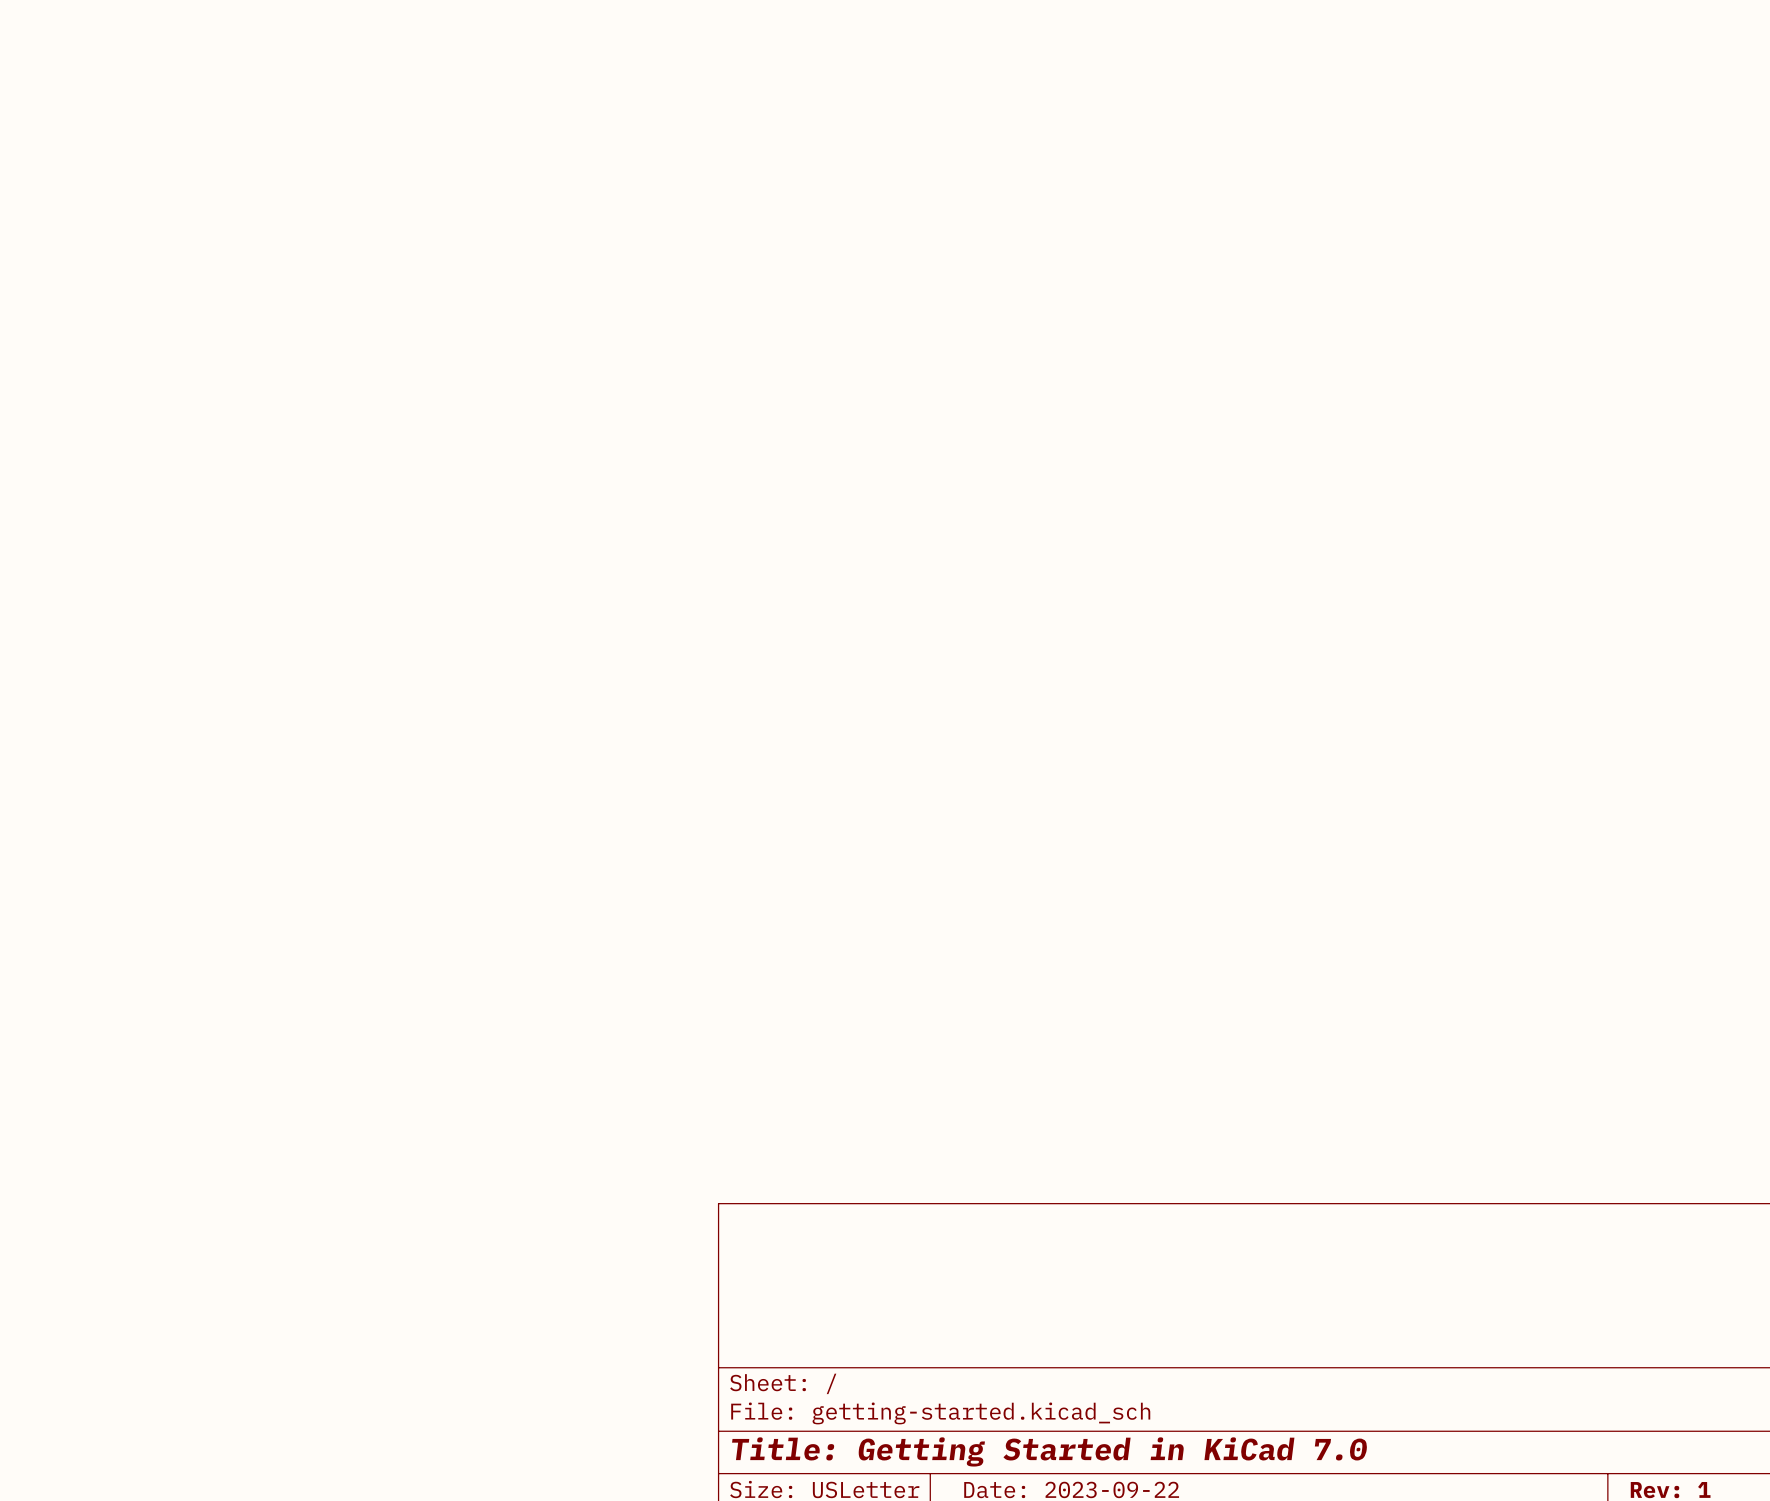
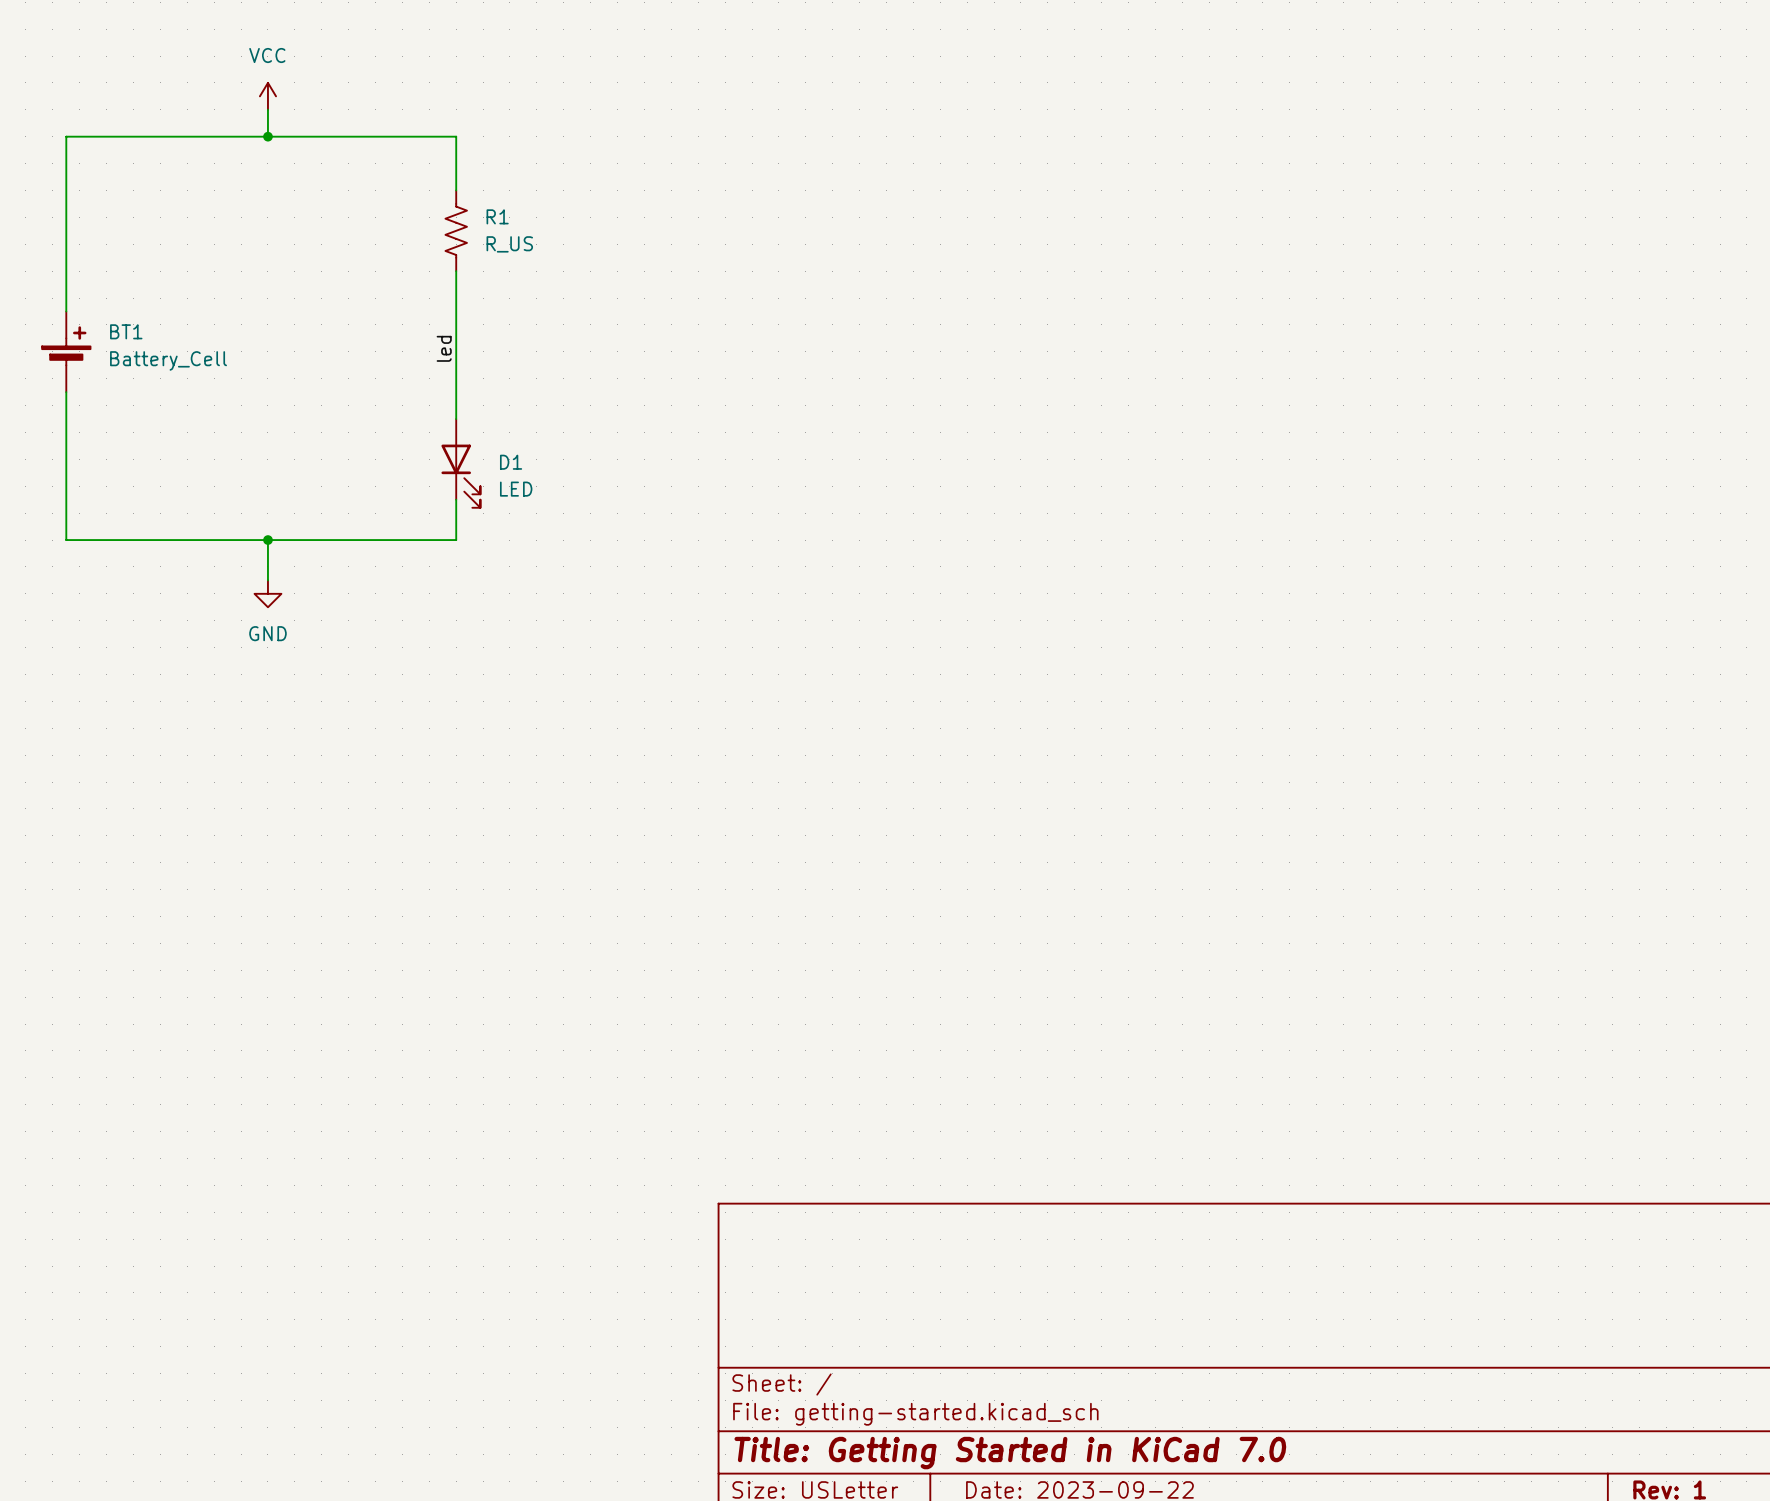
power symbol: none -> VCC (267, 96)
wire: none -> (267, 109) (267, 136)
junction: none -> (267, 136)
wire: none -> (456, 190) (456, 136) (66, 136) (66, 311)
R1: none -> R_US (456, 230)
wire: none -> (456, 271) (456, 419)
label: none -> led (444, 348)
BT1: none -> Battery_Cell (66, 351)
wire: none -> (66, 392) (66, 540) (456, 540) (456, 499)
D1: none -> LED (460, 463)
wire: none -> (267, 540) (267, 580)
junction: none -> (267, 540)
power symbol: none -> GND (267, 593)

